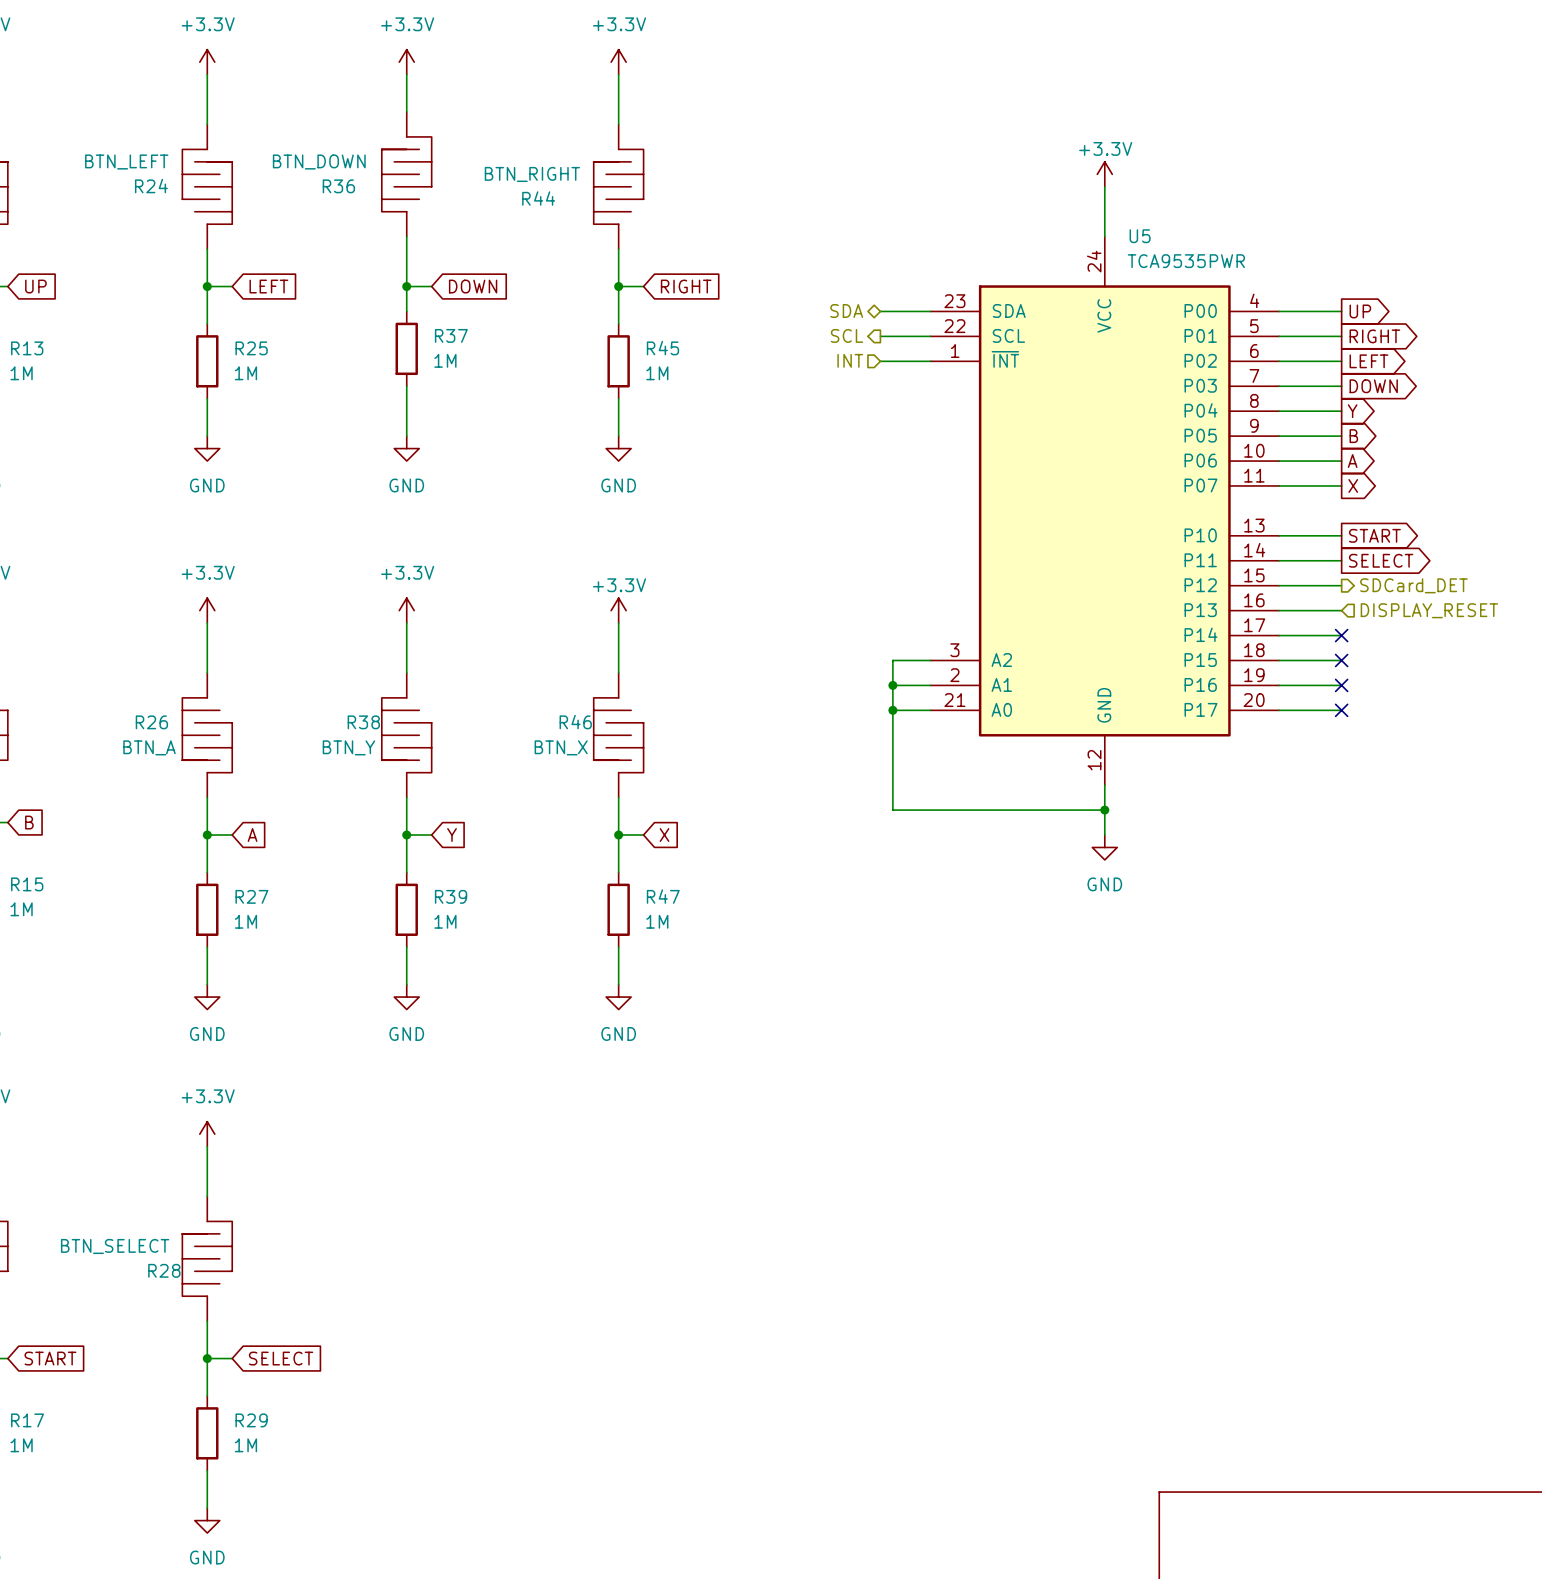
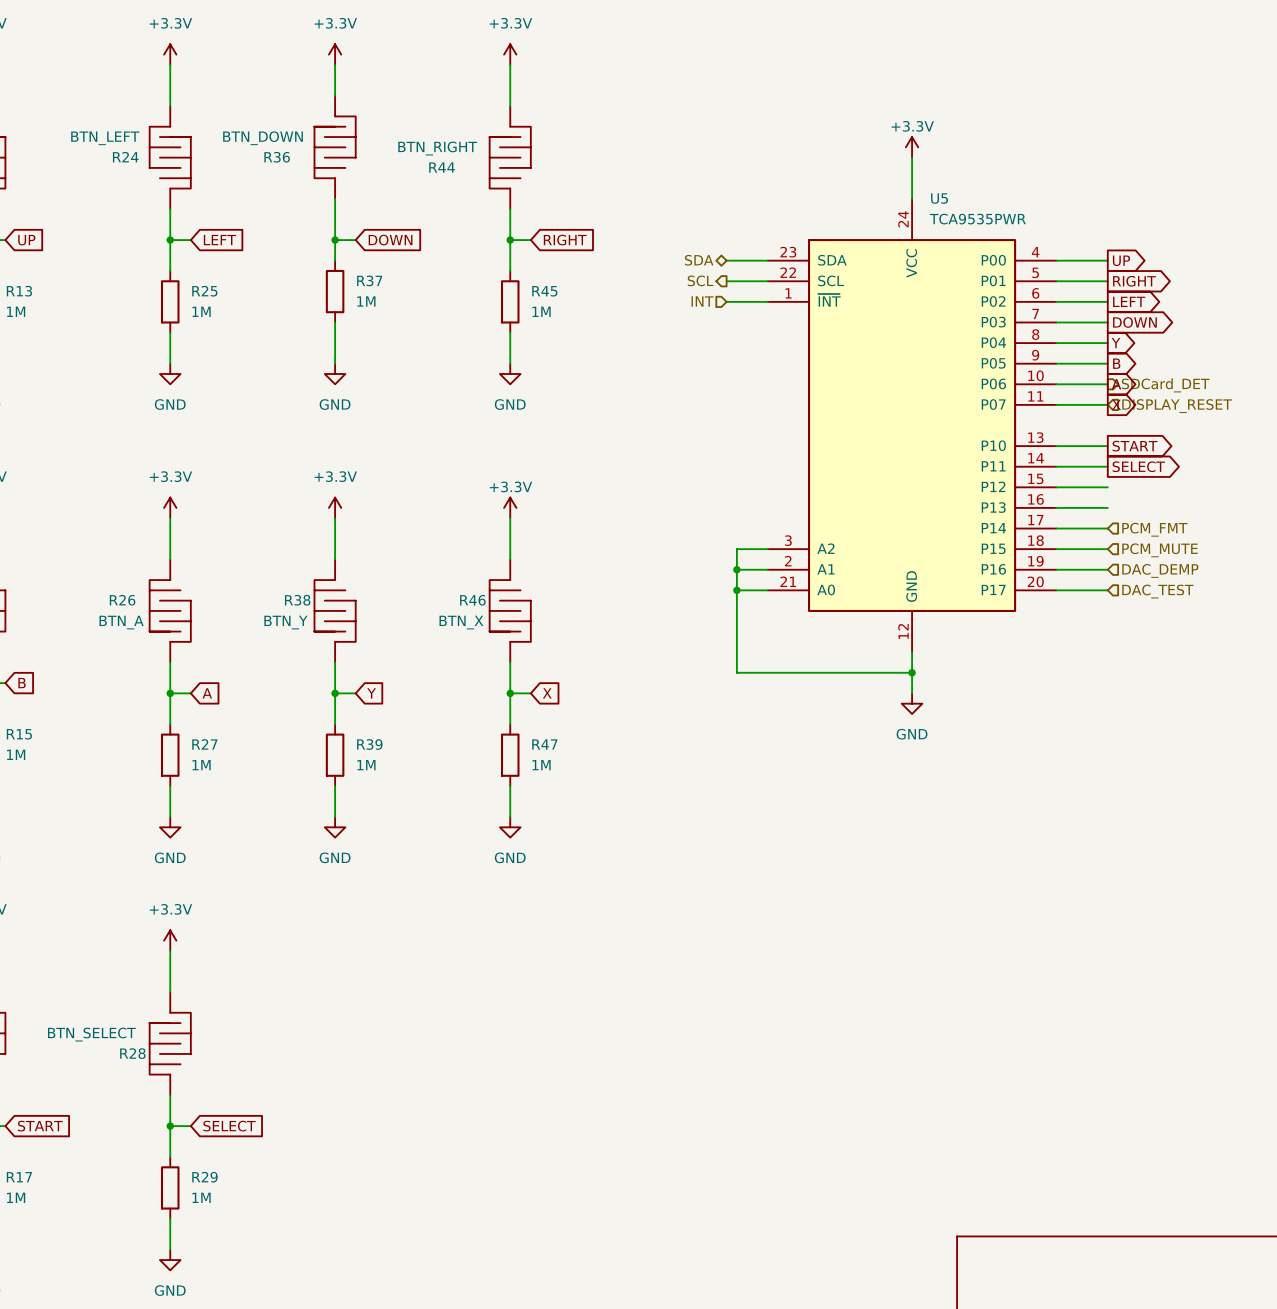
hierarchical label position: SDCard_DET (1413, 585) -> SDCard_DET (1165, 385)
hierarchical label position: DISPLAY_RESET (1429, 610) -> DISPLAY_RESET (1177, 406)
no-connect mark: (1341, 635) -> none
hierarchical label: none -> PCM_FMT (1154, 529)
no-connect mark: (1341, 660) -> none
hierarchical label: none -> PCM_MUTE (1160, 550)
no-connect mark: (1341, 685) -> none
hierarchical label: none -> DAC_DEMP (1160, 570)
no-connect mark: (1341, 710) -> none
hierarchical label: none -> DAC_TEST (1157, 591)

